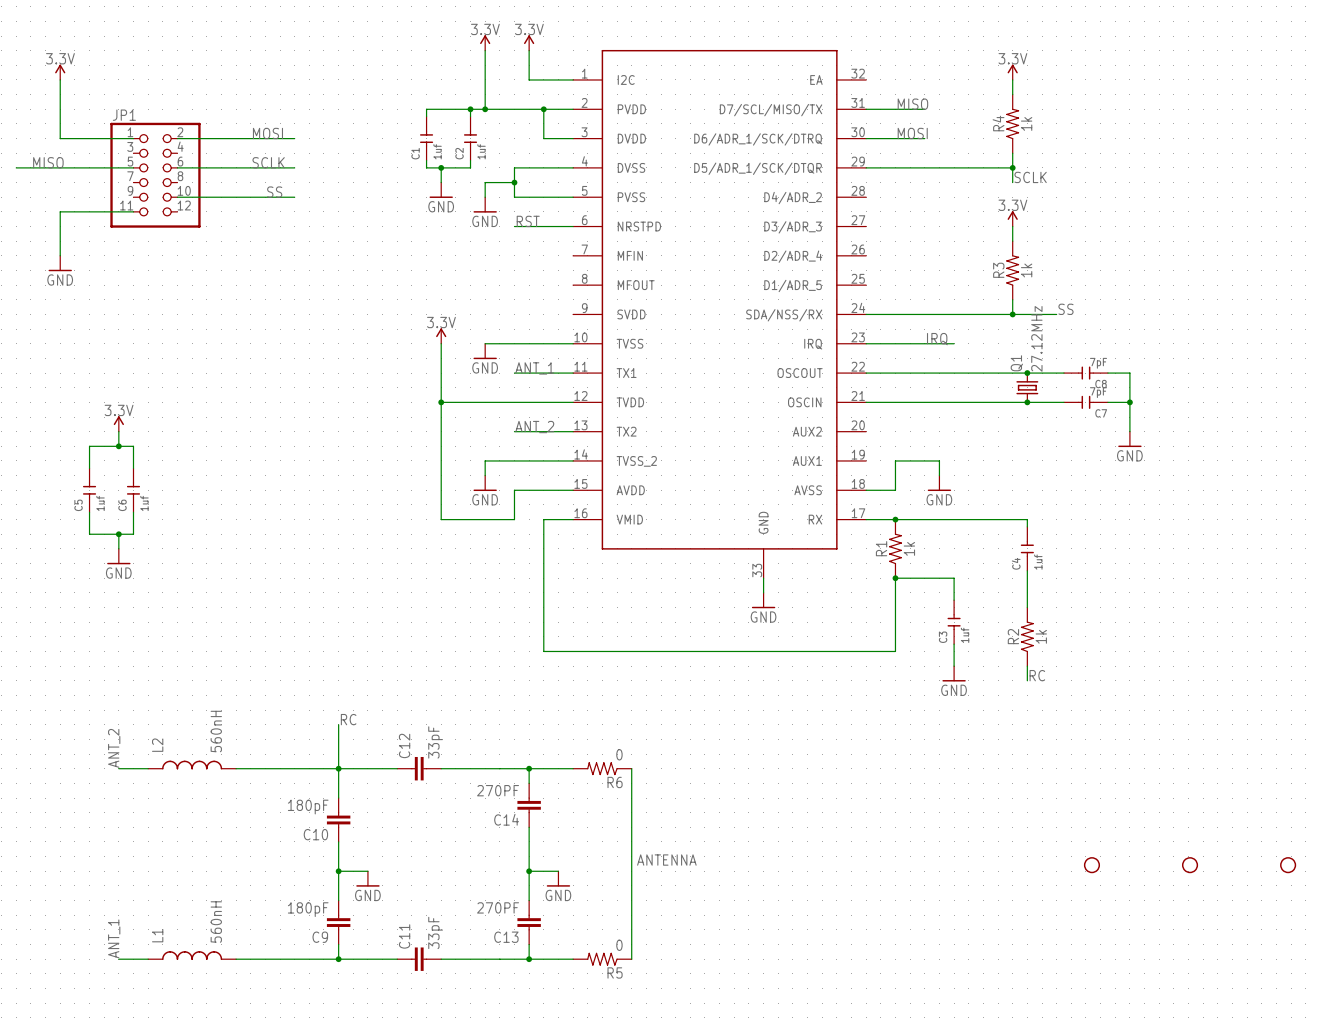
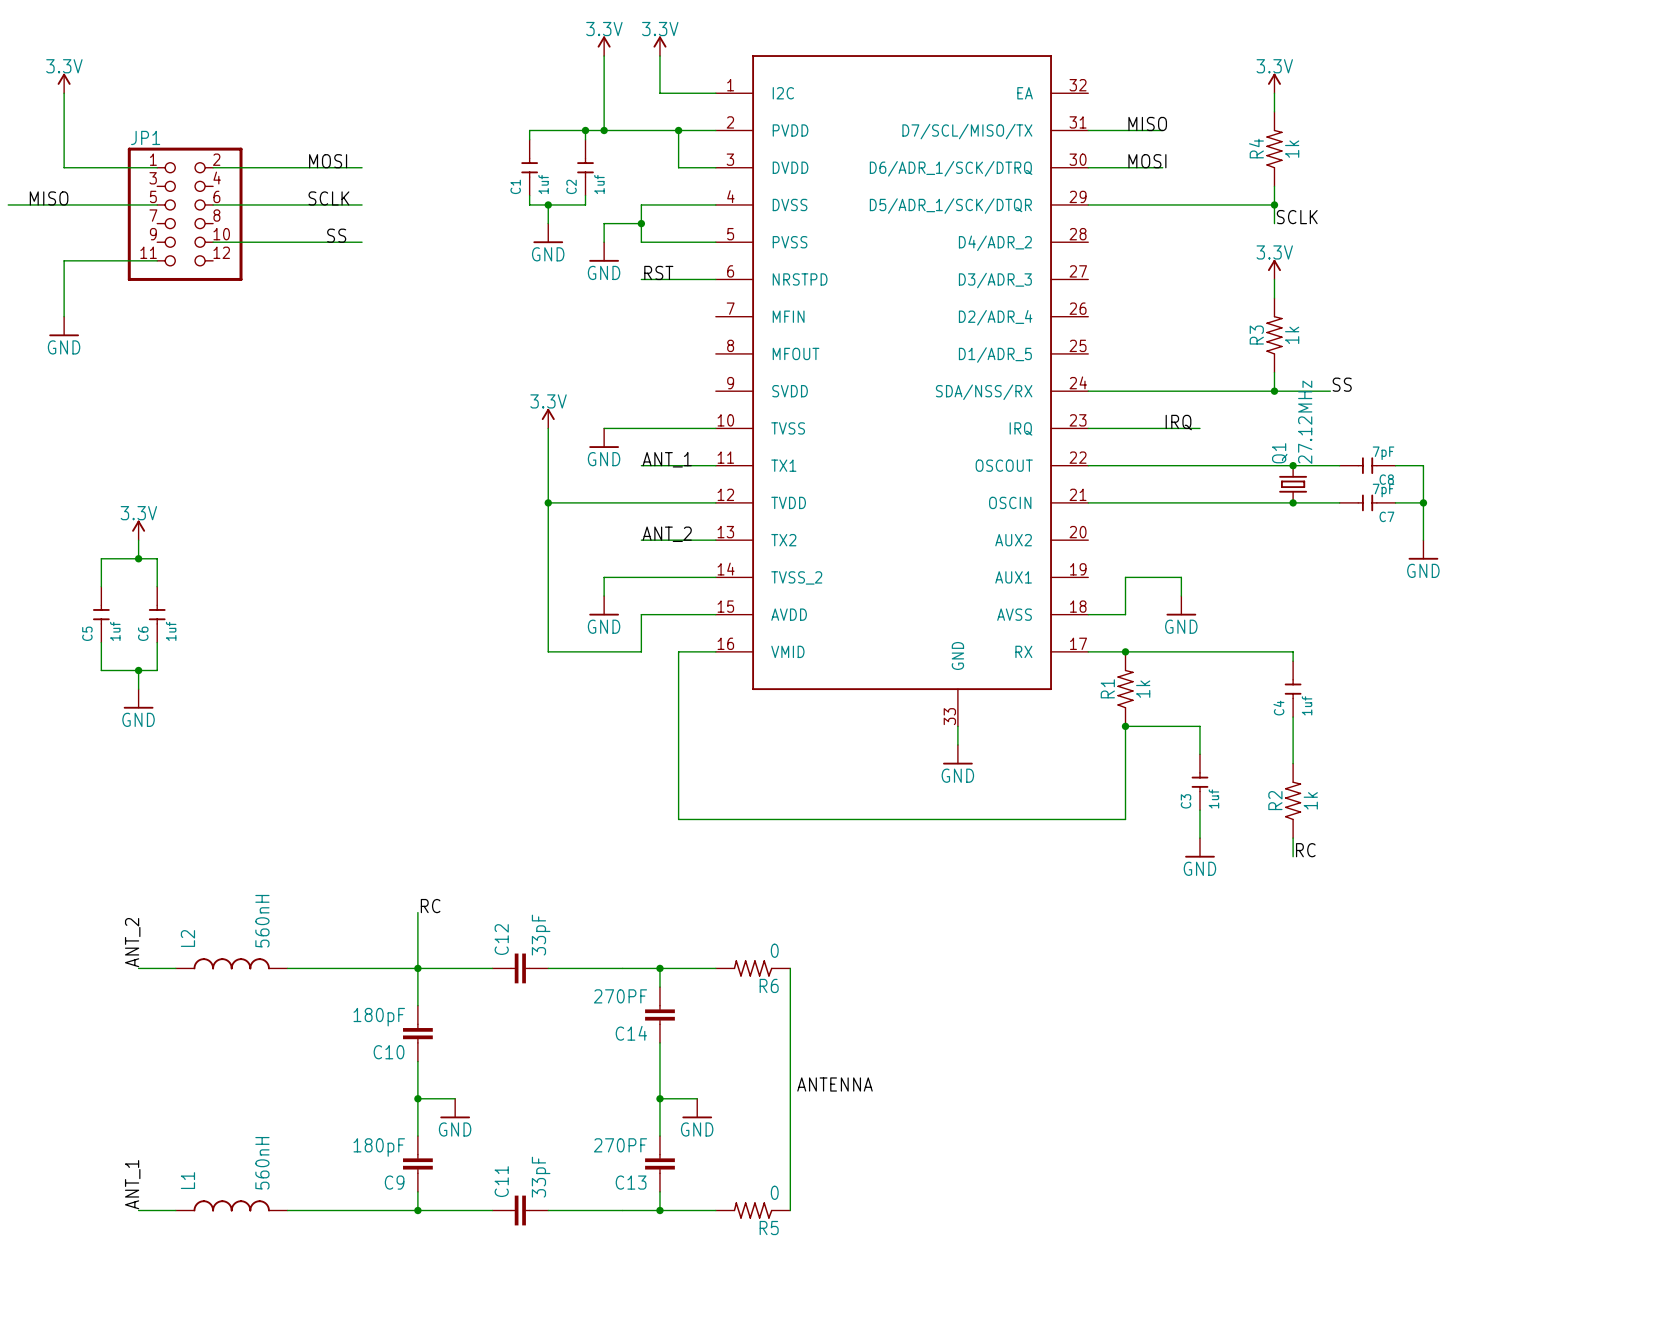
part: (1091, 865) -> none
part: (1190, 865) -> none
part: (1288, 865) -> none

